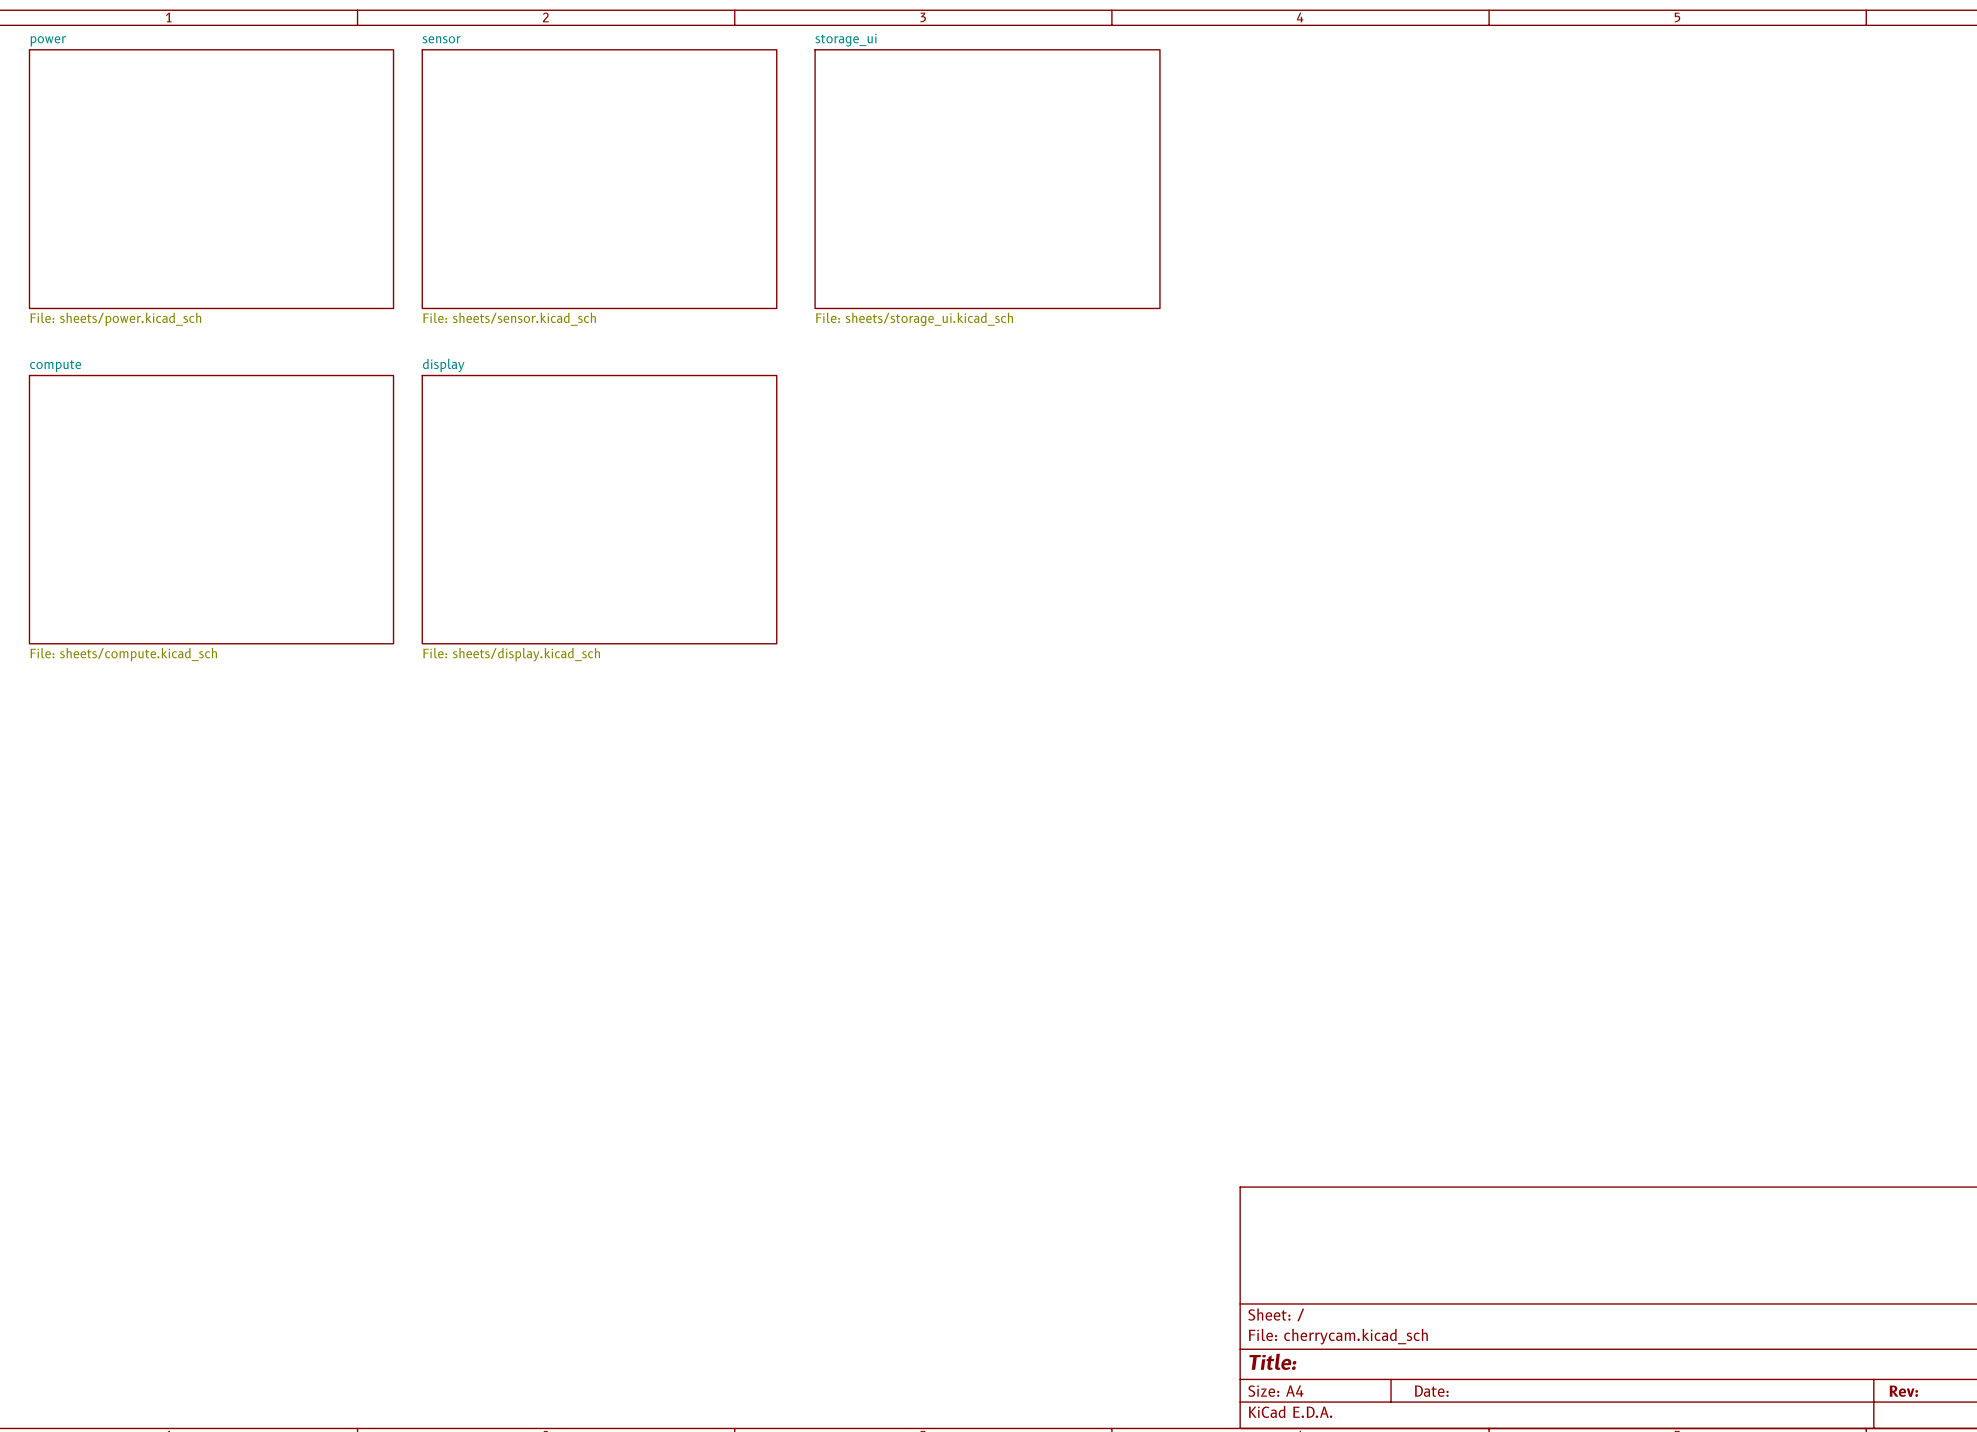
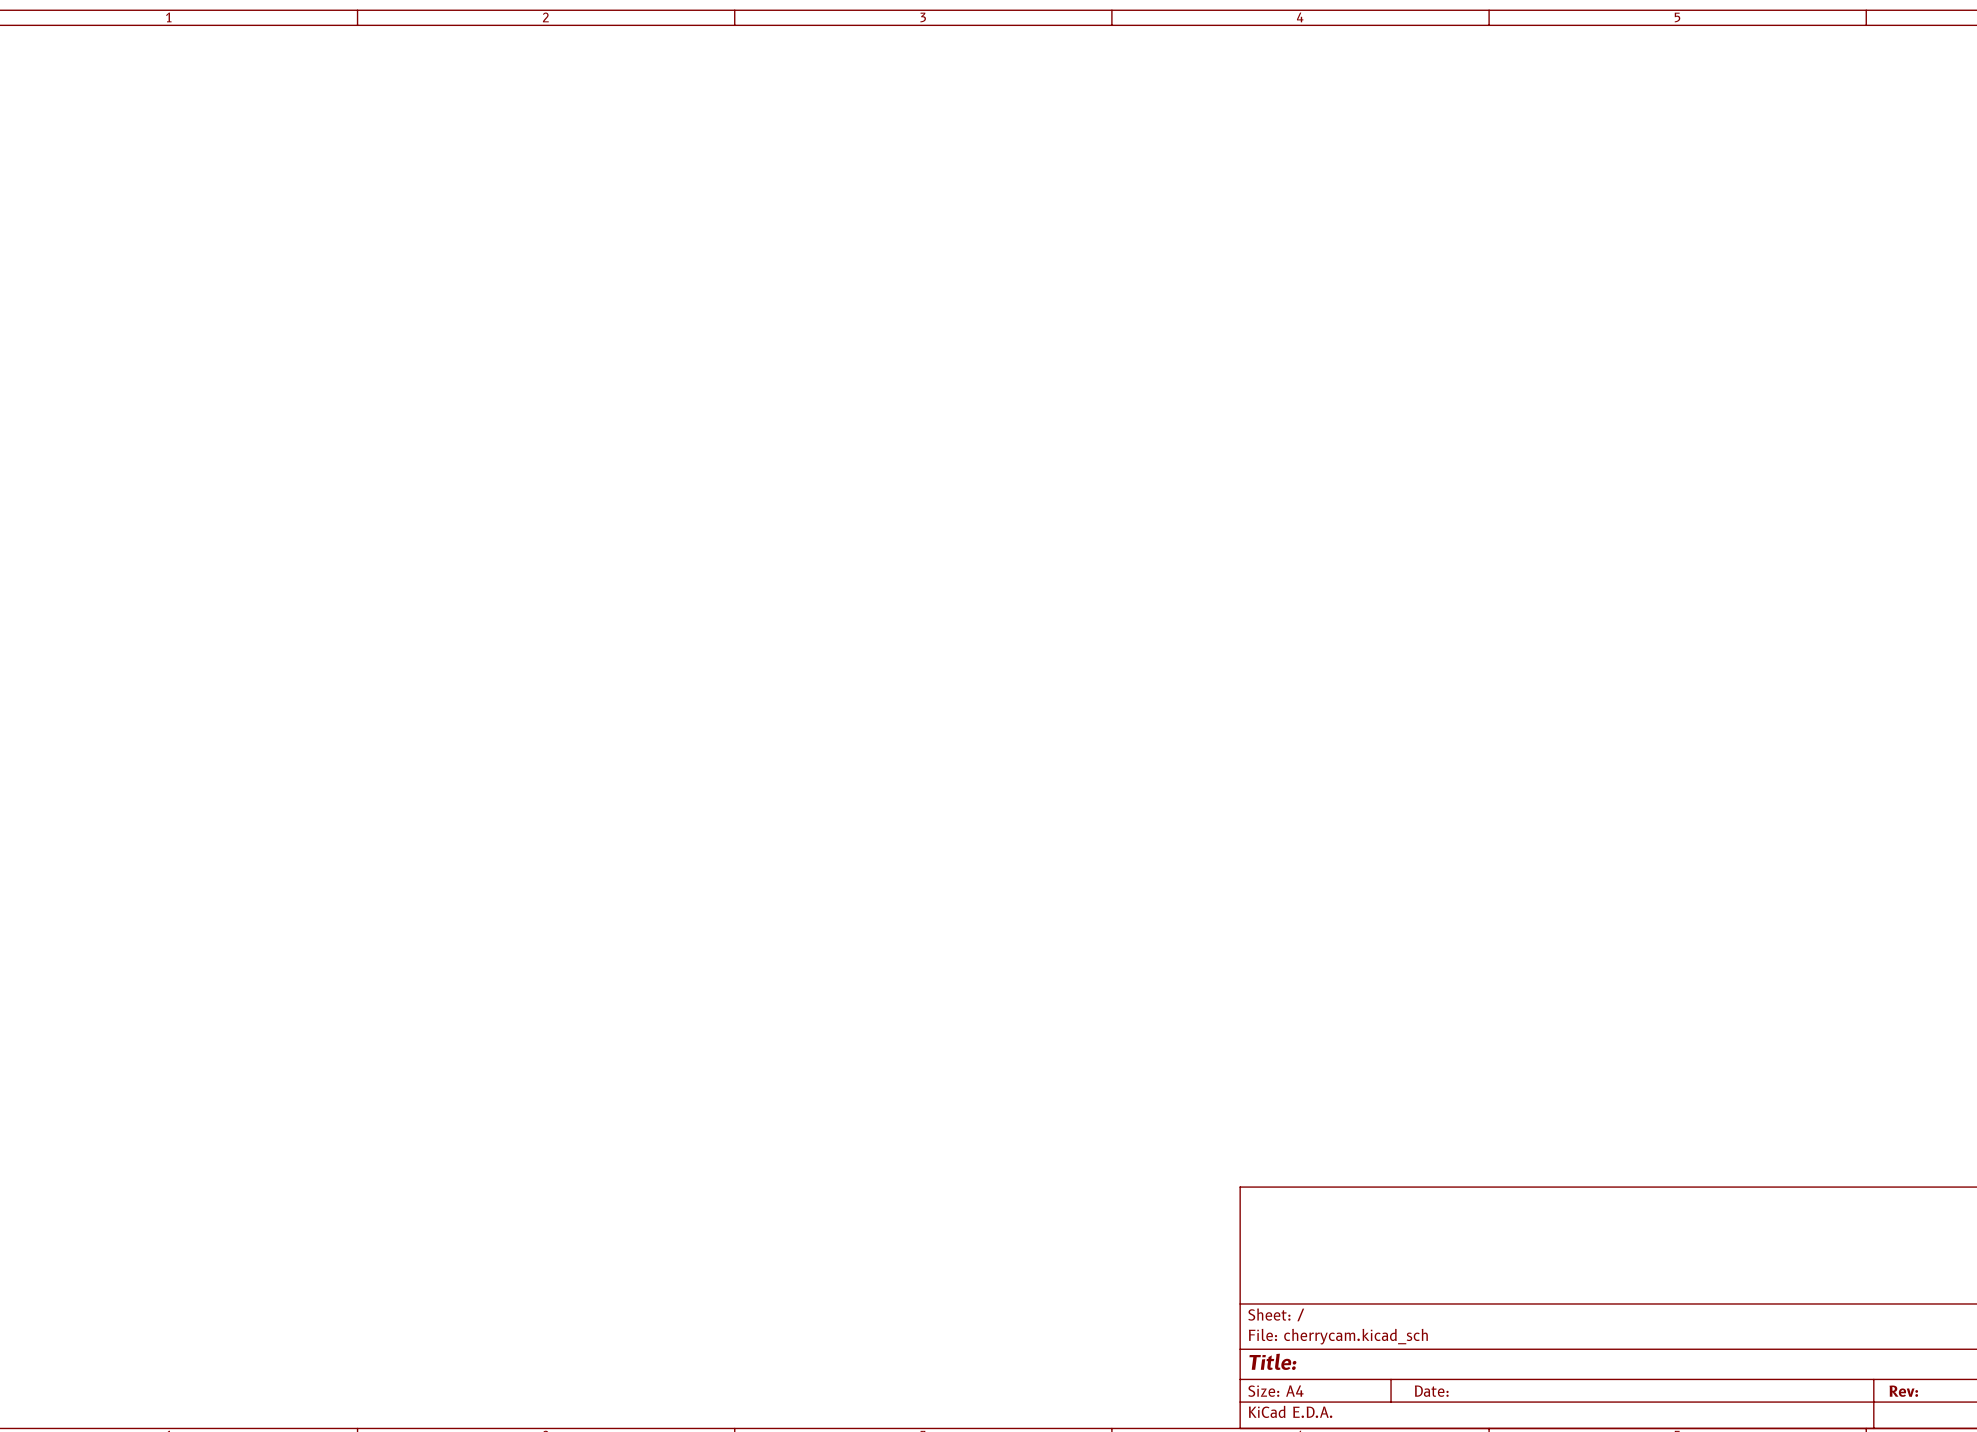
sheet power: File: sheets/power.kicad_sch (211, 179) -> none
sheet sensor: File: sheets/sensor.kicad_sch (599, 179) -> none
sheet storage_ui: File: sheets/storage_ui.kicad_sch (987, 179) -> none
sheet compute: File: sheets/compute.kicad_sch (211, 509) -> none
sheet display: File: sheets/display.kicad_sch (599, 509) -> none

